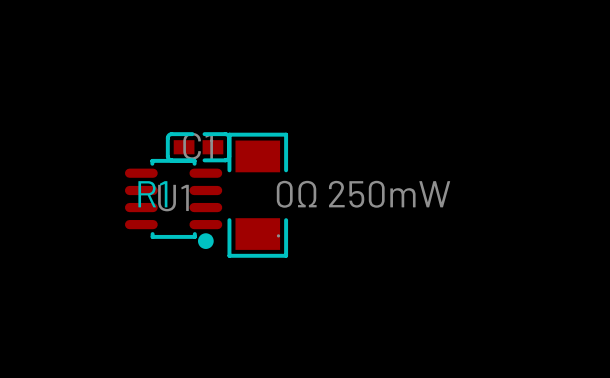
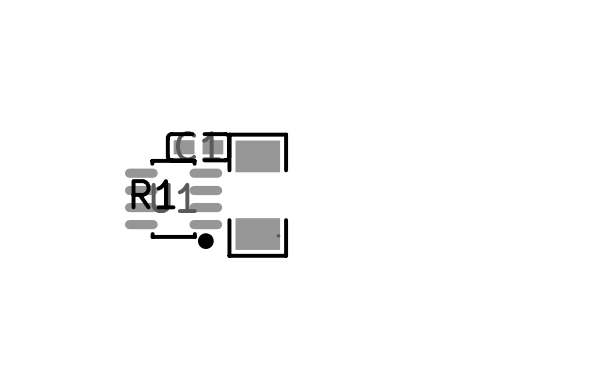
R1 value: 0Ω 250mW (363, 194) -> none

